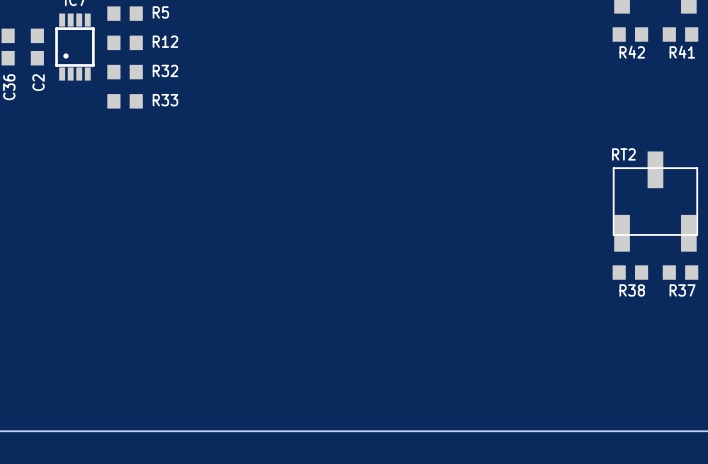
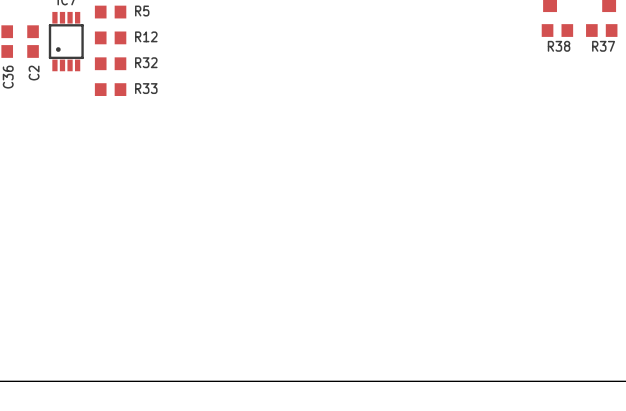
R42 name: R42 (632, 52) -> R38 (559, 46)
R41 name: R41 (682, 52) -> R37 (603, 46)
RT2: (655, 201) -> none
R38: (630, 272) -> none
R37: (680, 272) -> none

